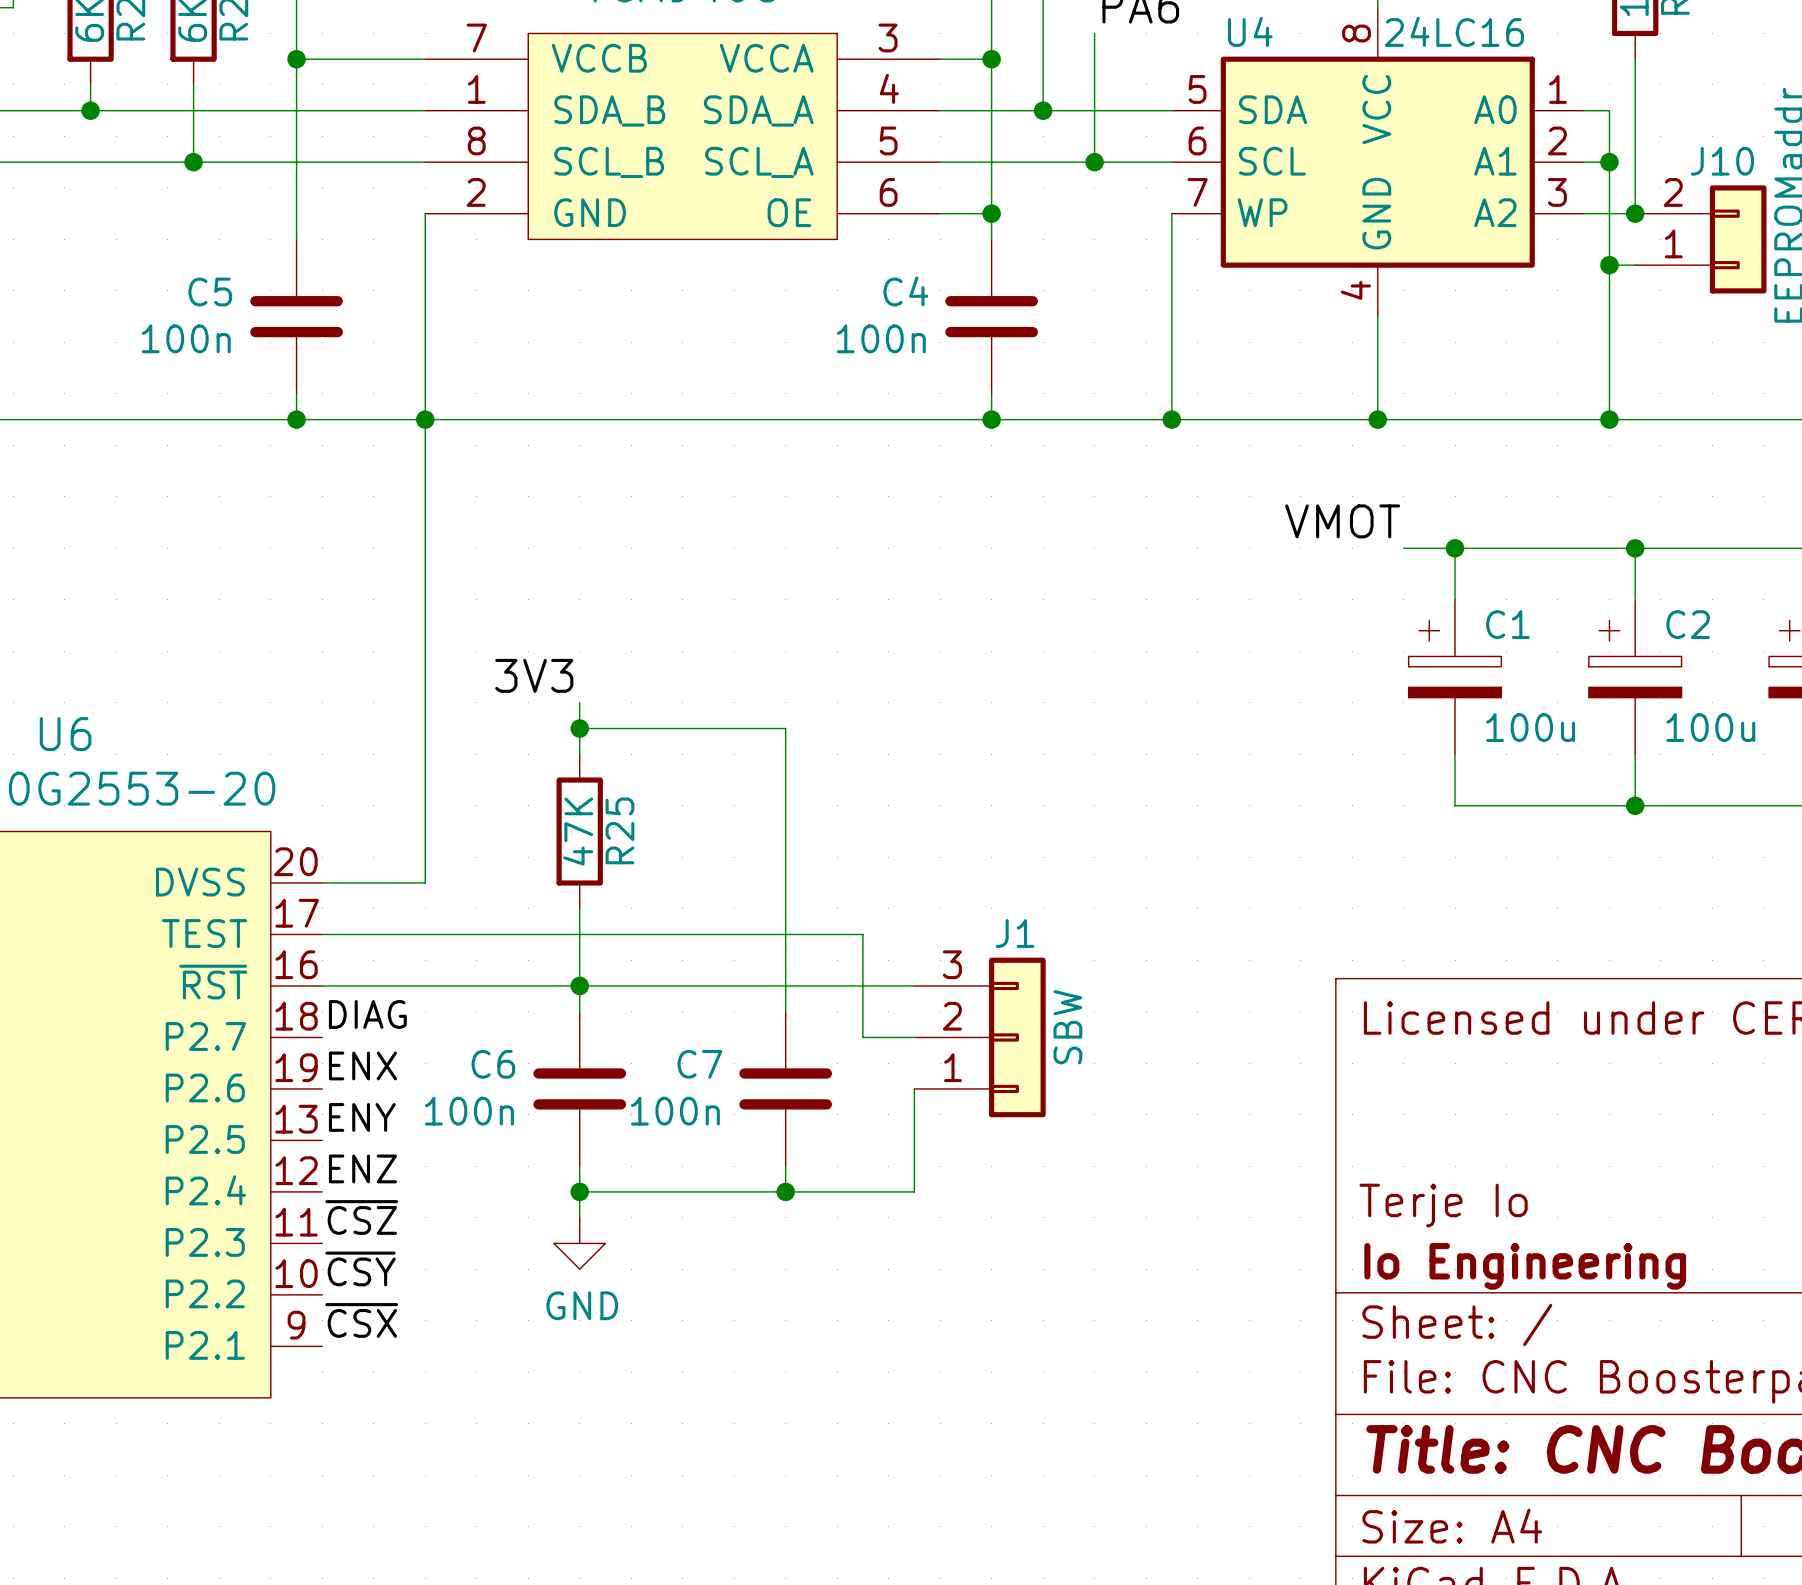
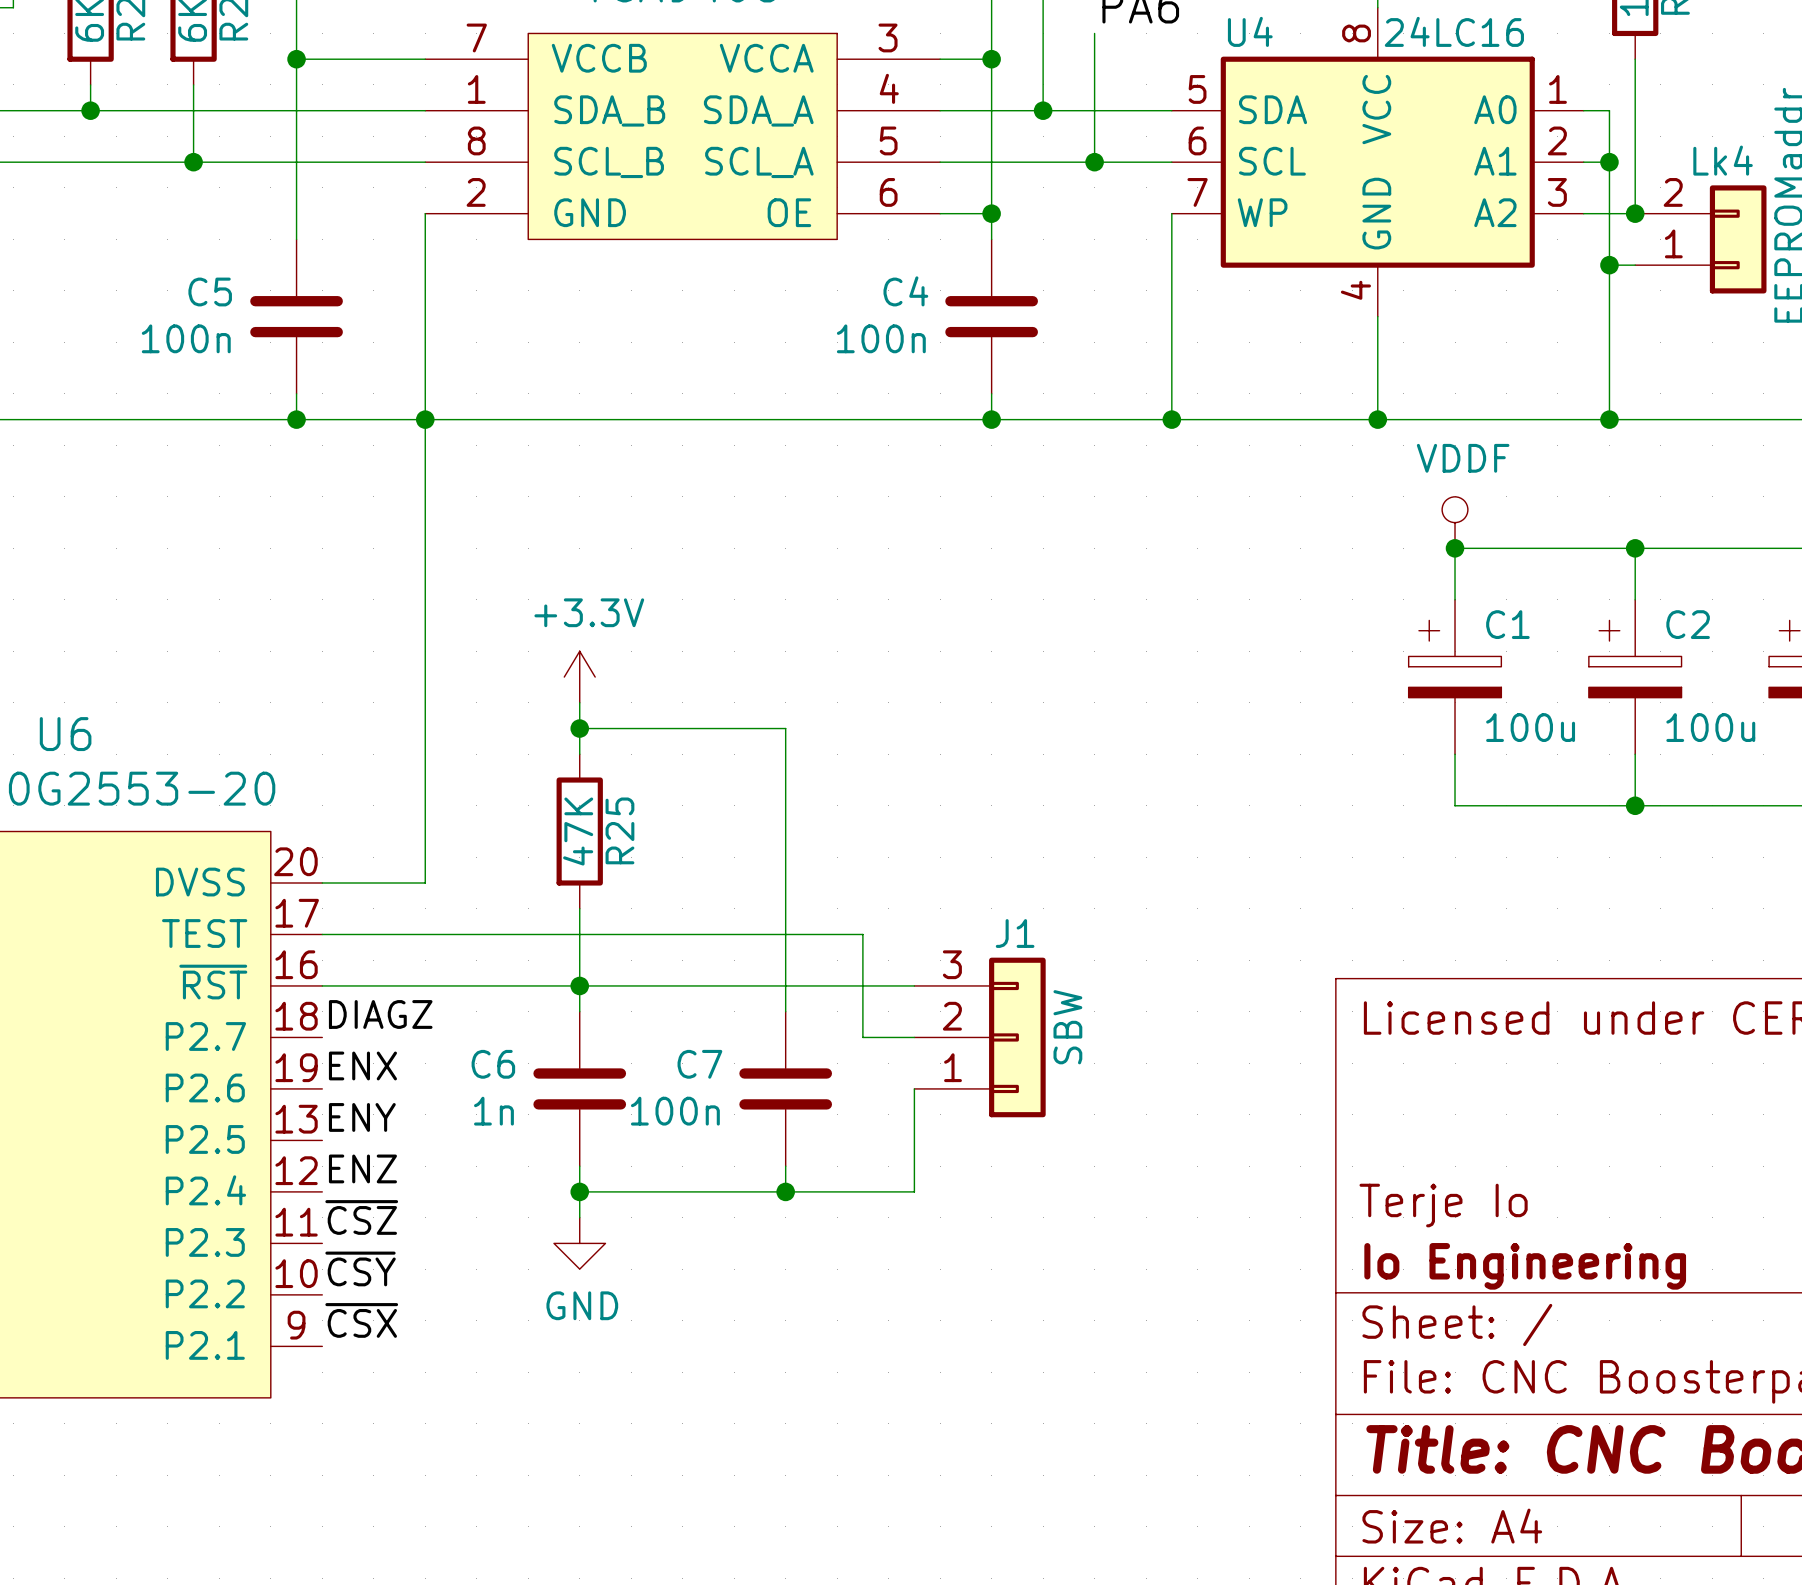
J10 name: J10 (1722, 161) -> Lk4 (1723, 160)
label: VMOT (1342, 521) -> none
power symbol: none -> VDDF (1455, 522)
wire: (1403, 548) (1455, 548) -> none
label: 3V3 (534, 675) -> none
power symbol: none -> +3.3V (579, 677)
label: DIAG (367, 1014) -> DIAGZ (380, 1014)
C6 value: 100n (469, 1111) -> 1n (493, 1111)

